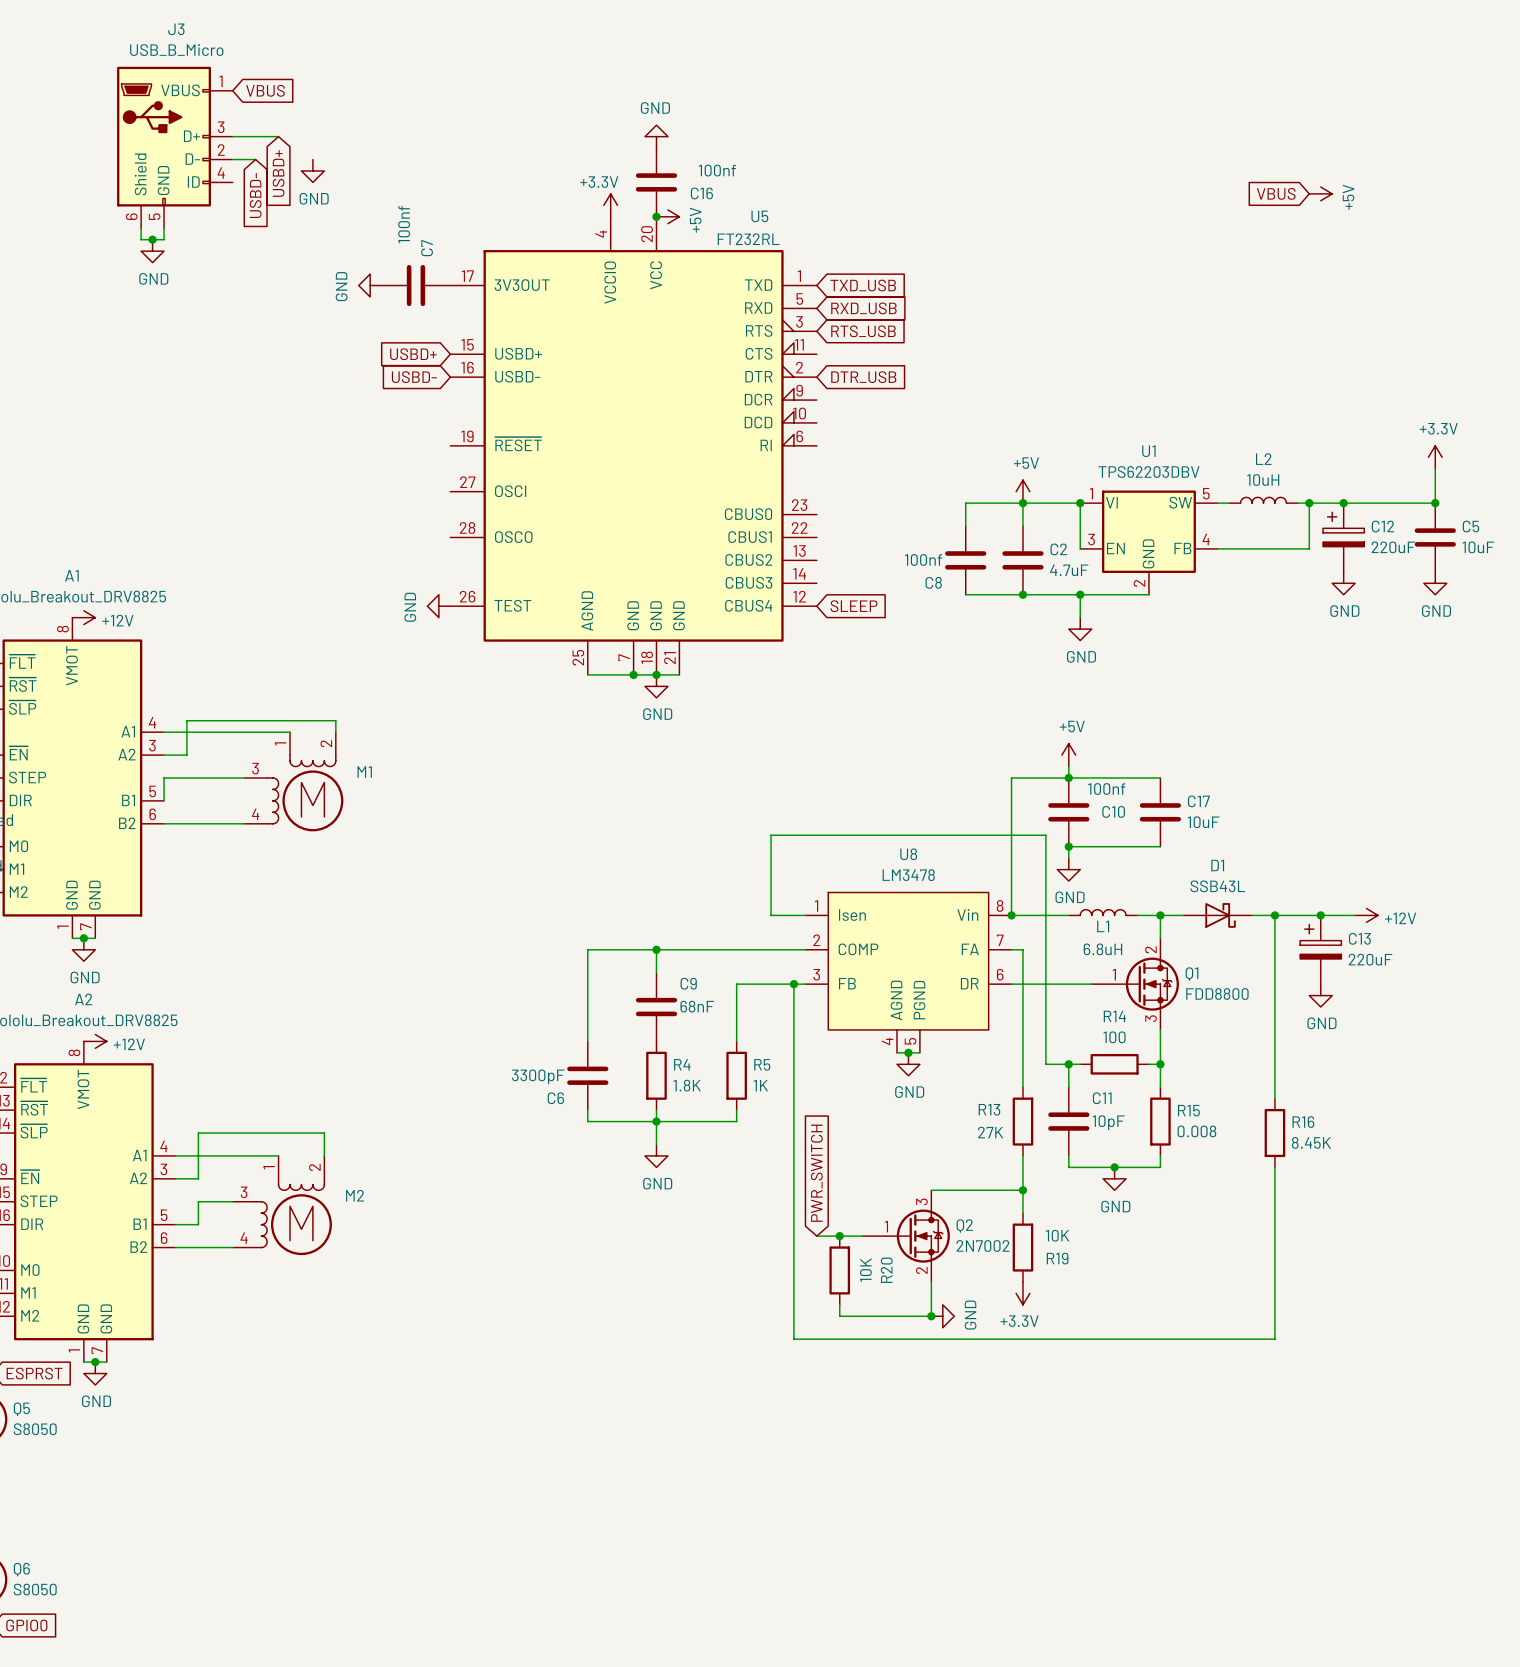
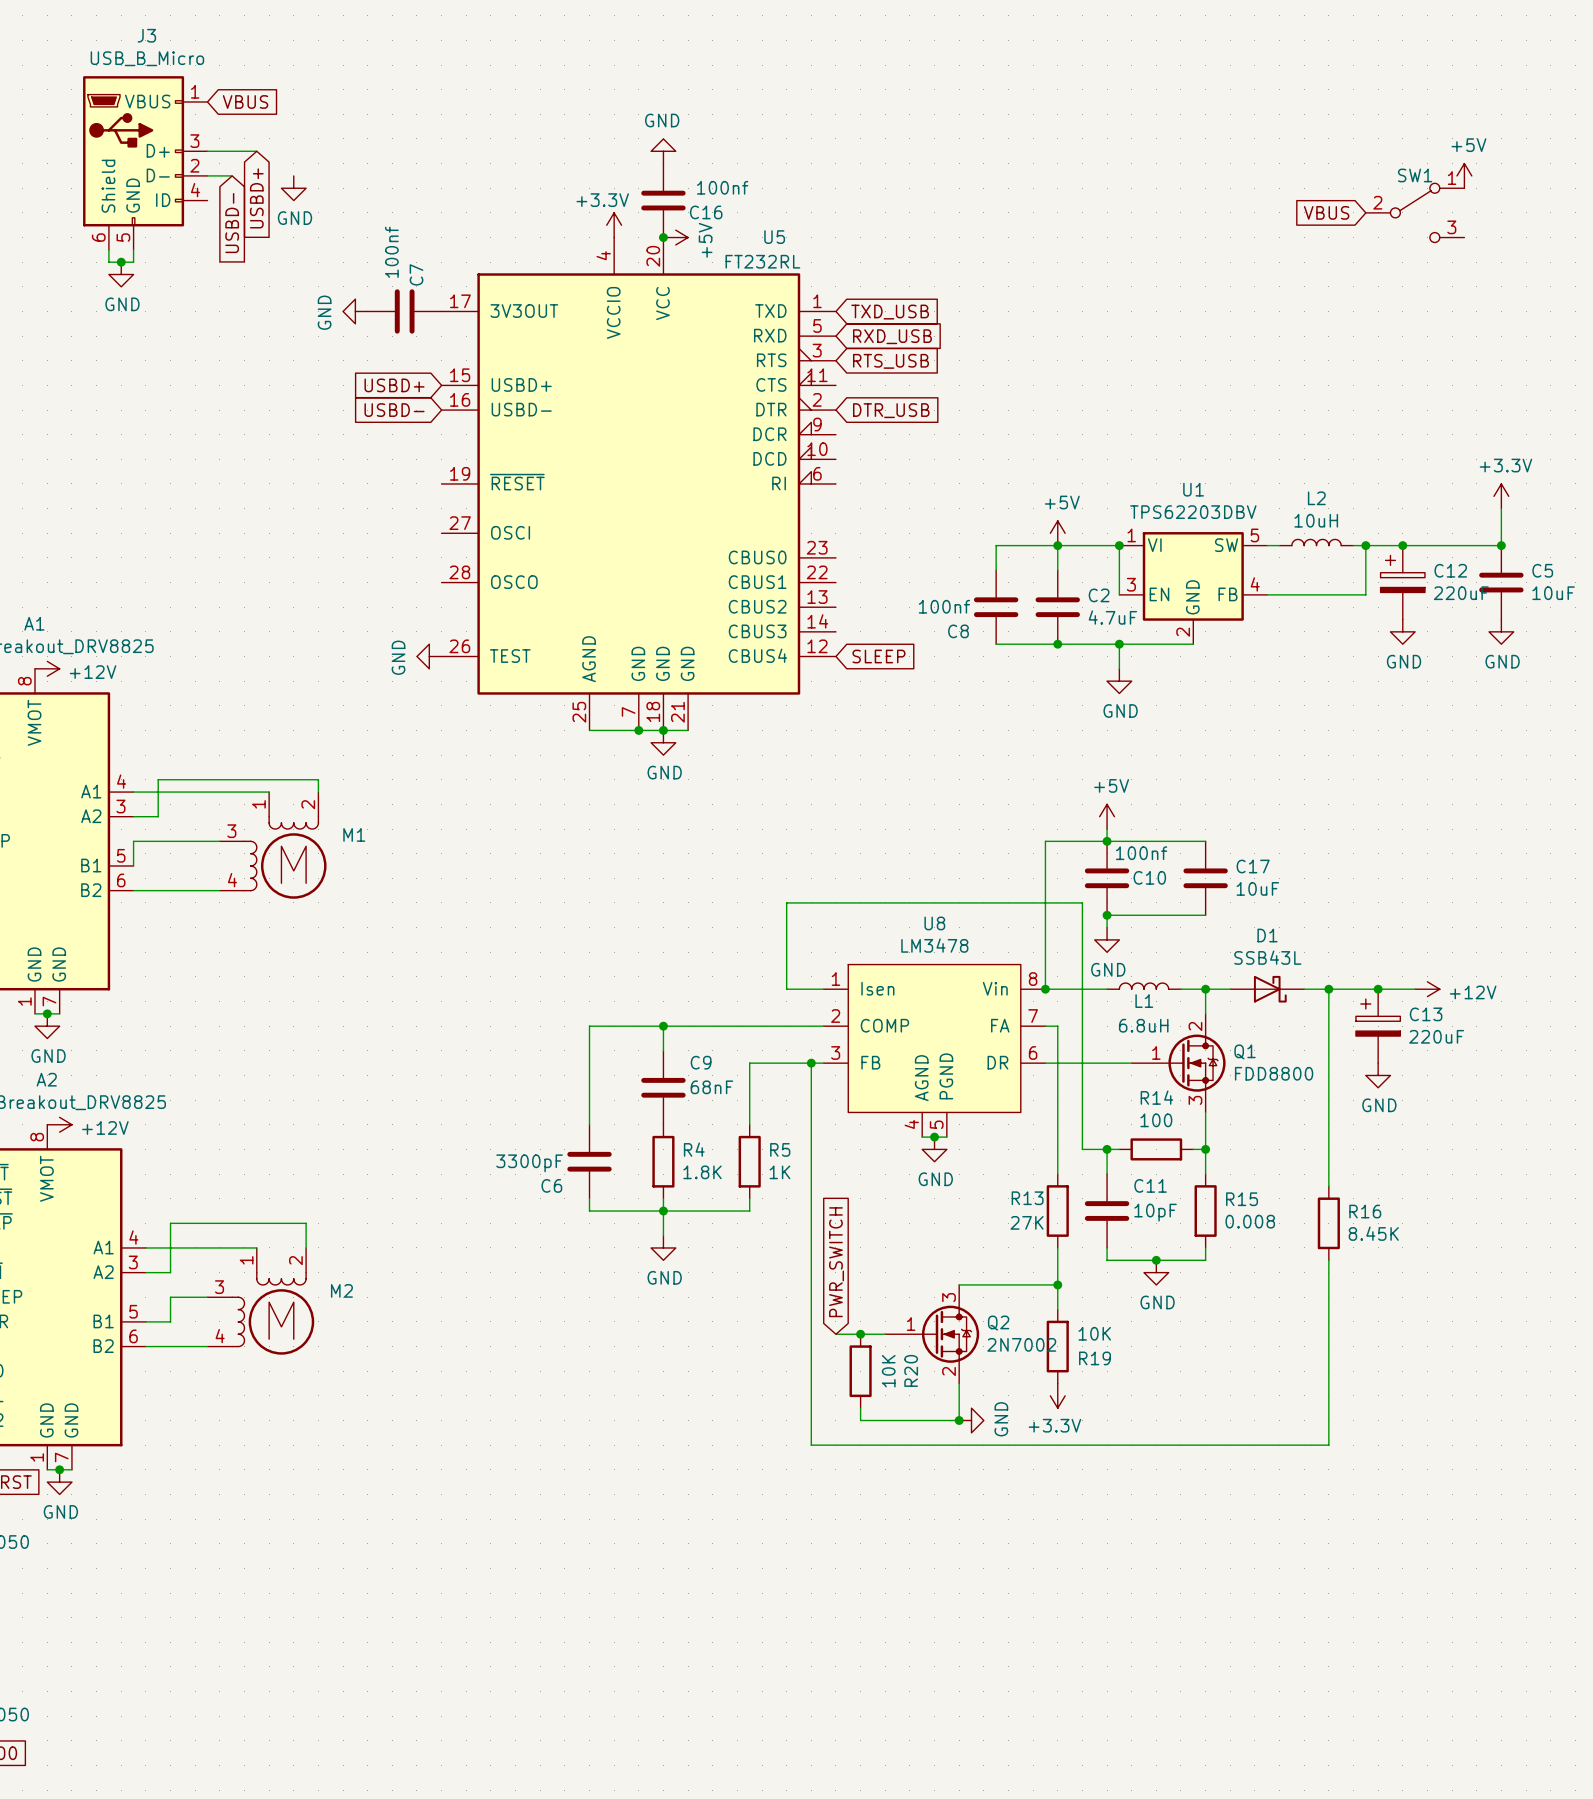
power symbol rotation: 0° (1320, 193) -> 90° counterclockwise (1464, 175)
power symbol position: +5V (1320, 193) -> +5V (1464, 175)
SW1: none -> (1415, 212)

